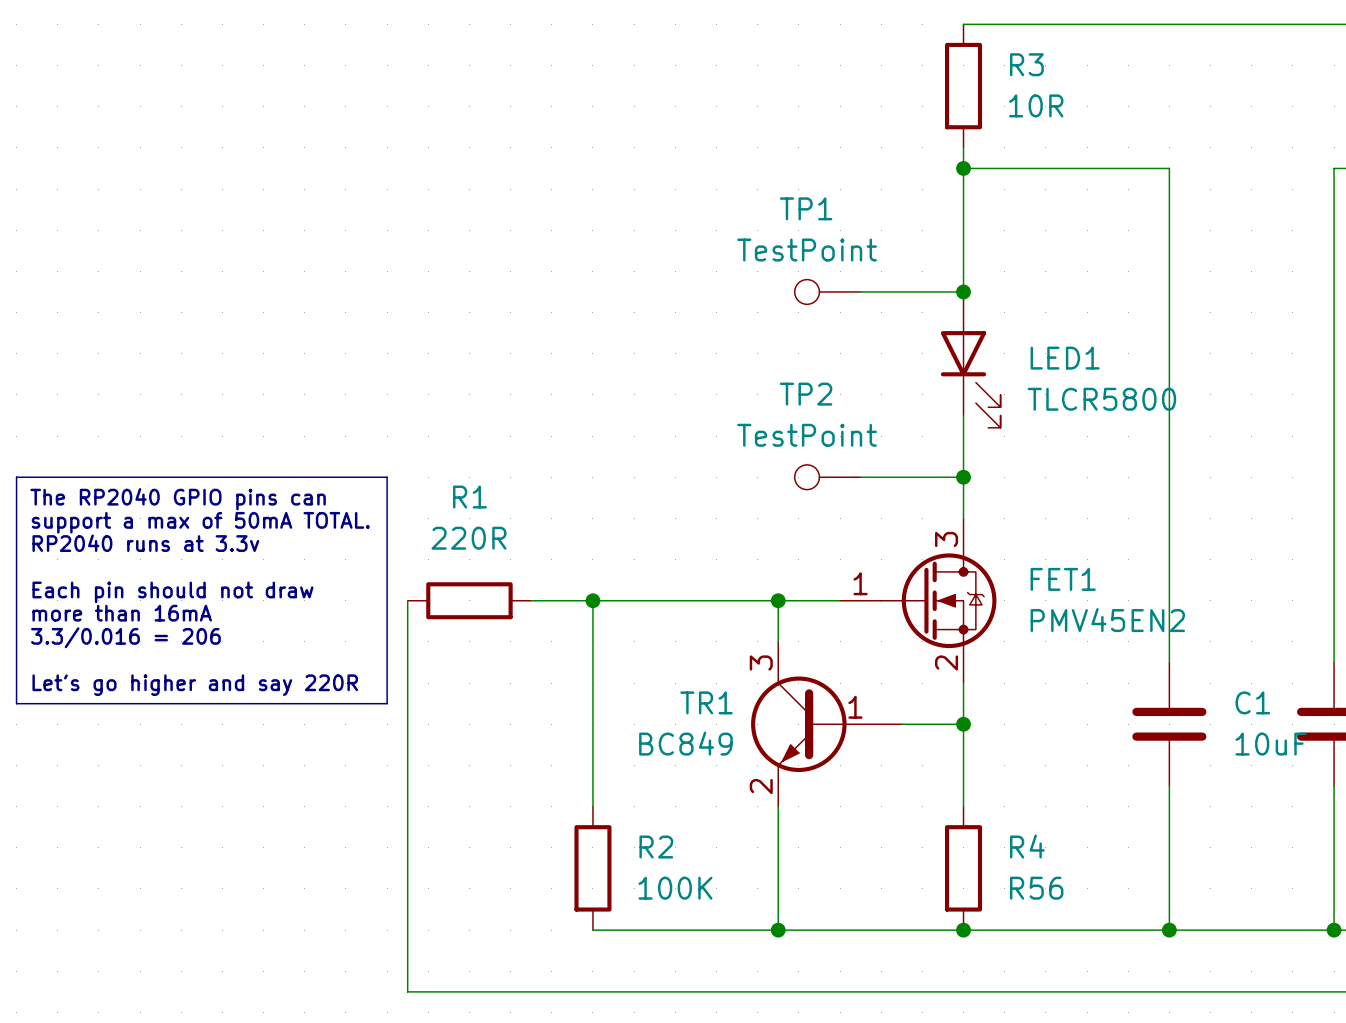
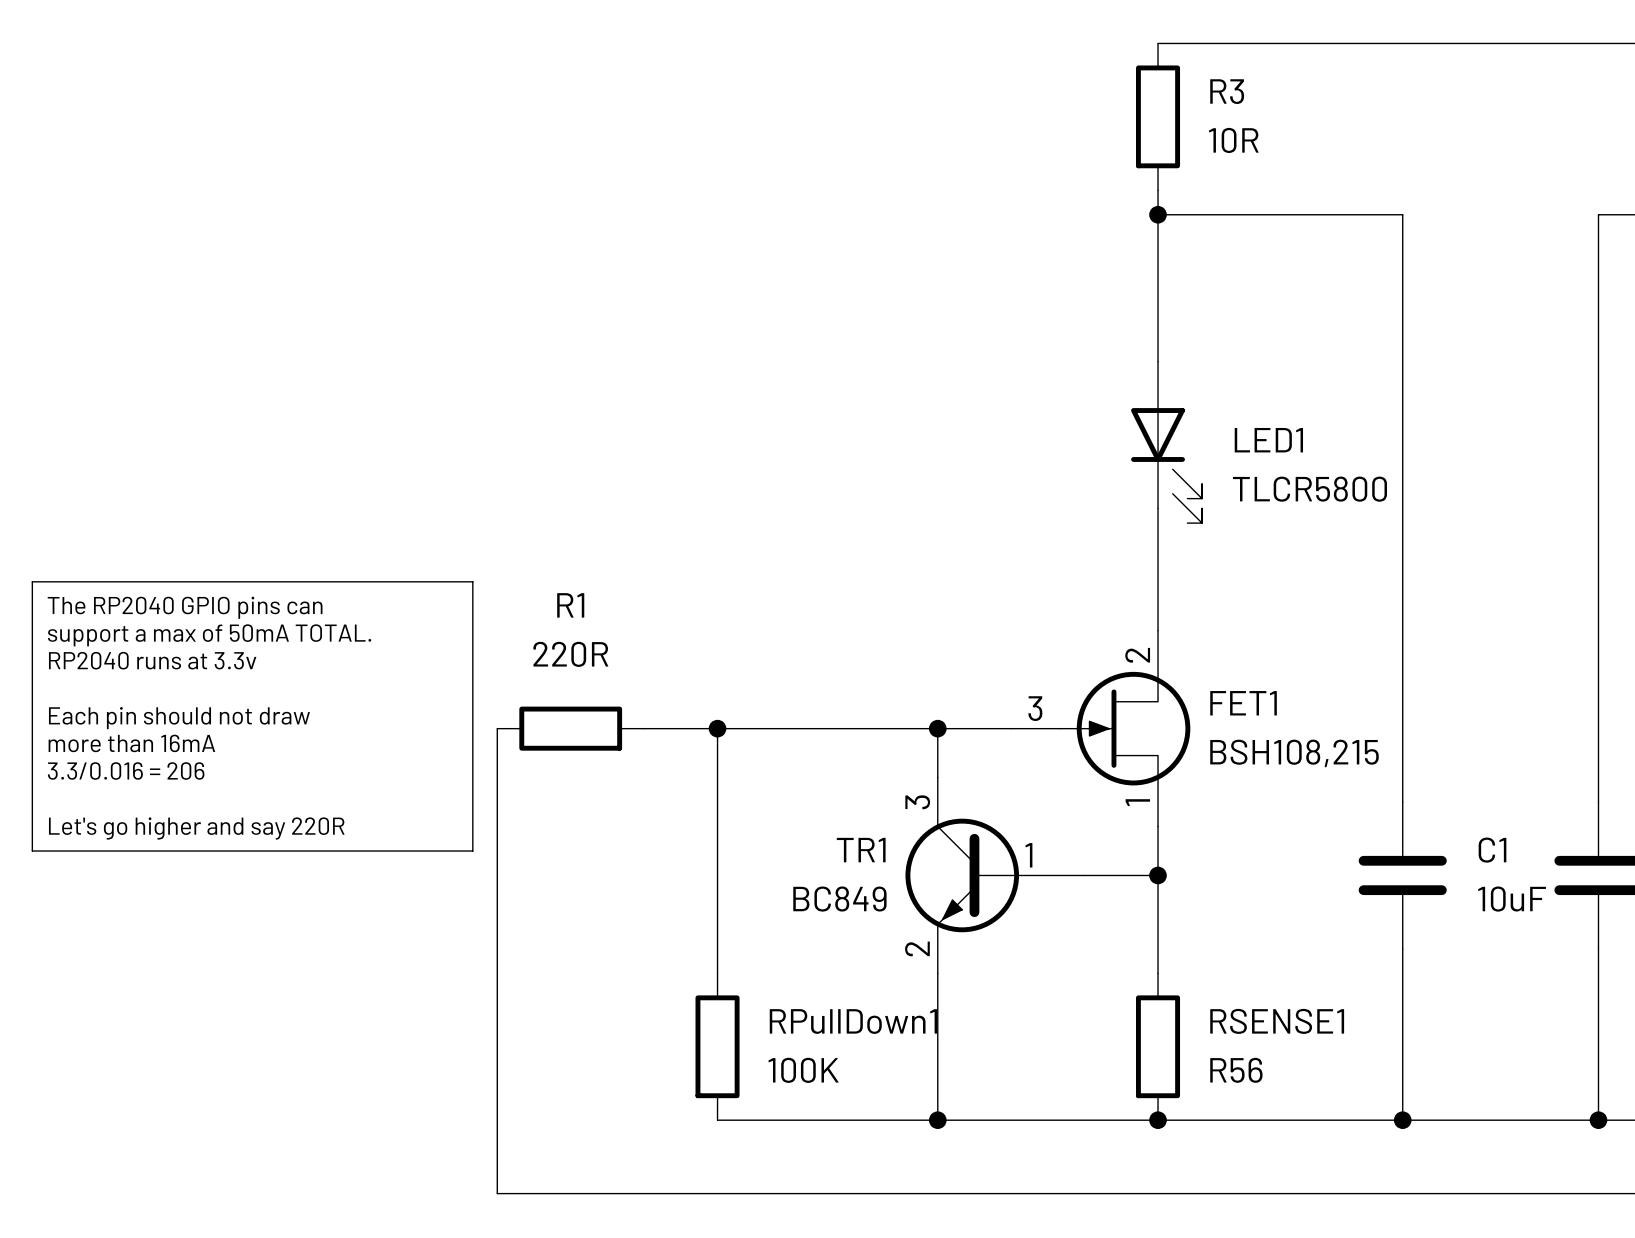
TP1: TestPoint (827, 291) -> none
wire: (860, 291) (963, 291) -> none
junction: (963, 291) -> none
TP2: TestPoint (827, 477) -> none
wire: (860, 477) (963, 477) -> none
junction: (963, 477) -> none
FET1 symbol: [840, 518, 997, 684] -> [1011, 630, 1191, 827]
FET1 value: PMV45EN2 (1107, 620) -> BSH108,215 (1294, 753)
R4 name: R4 (1027, 846) -> RSENSE1 (1277, 1021)
R2 name: R2 (656, 847) -> RPullDown1 (853, 1021)

